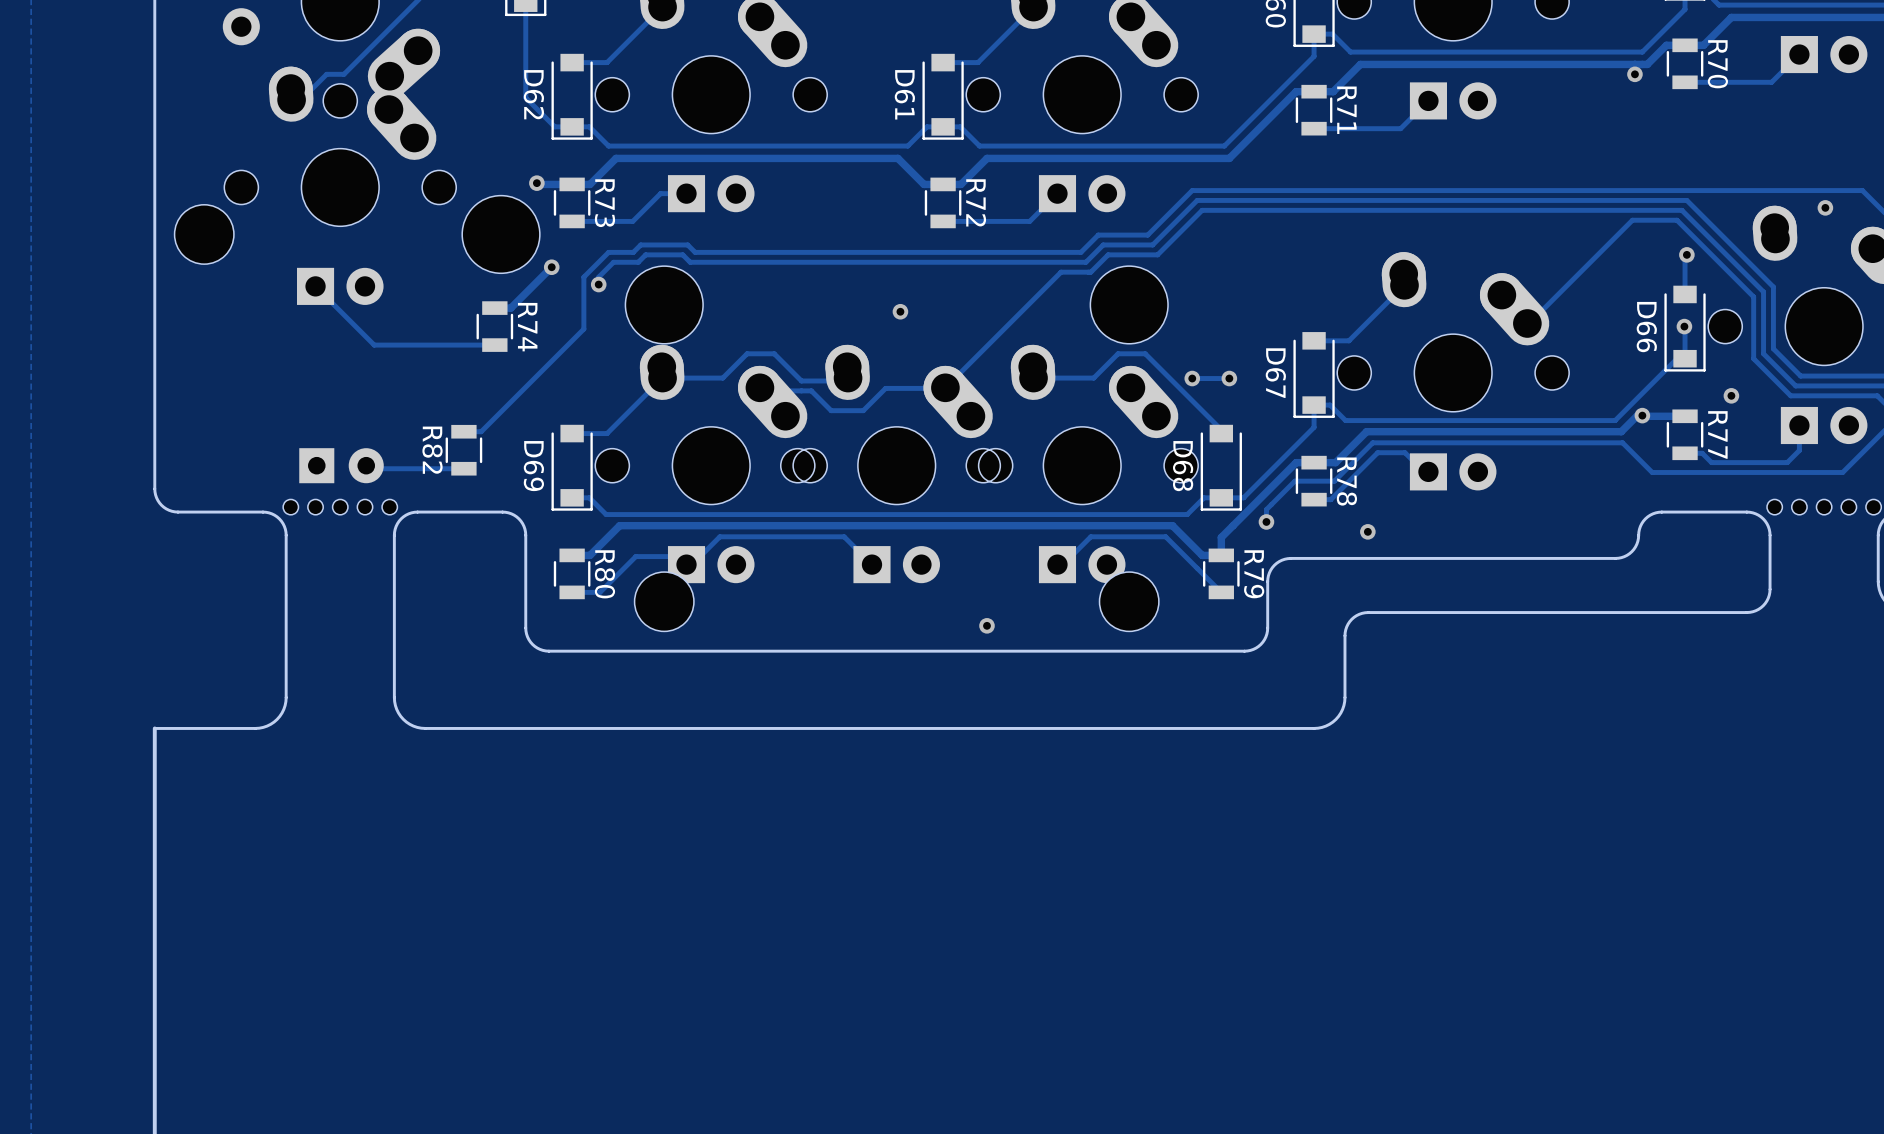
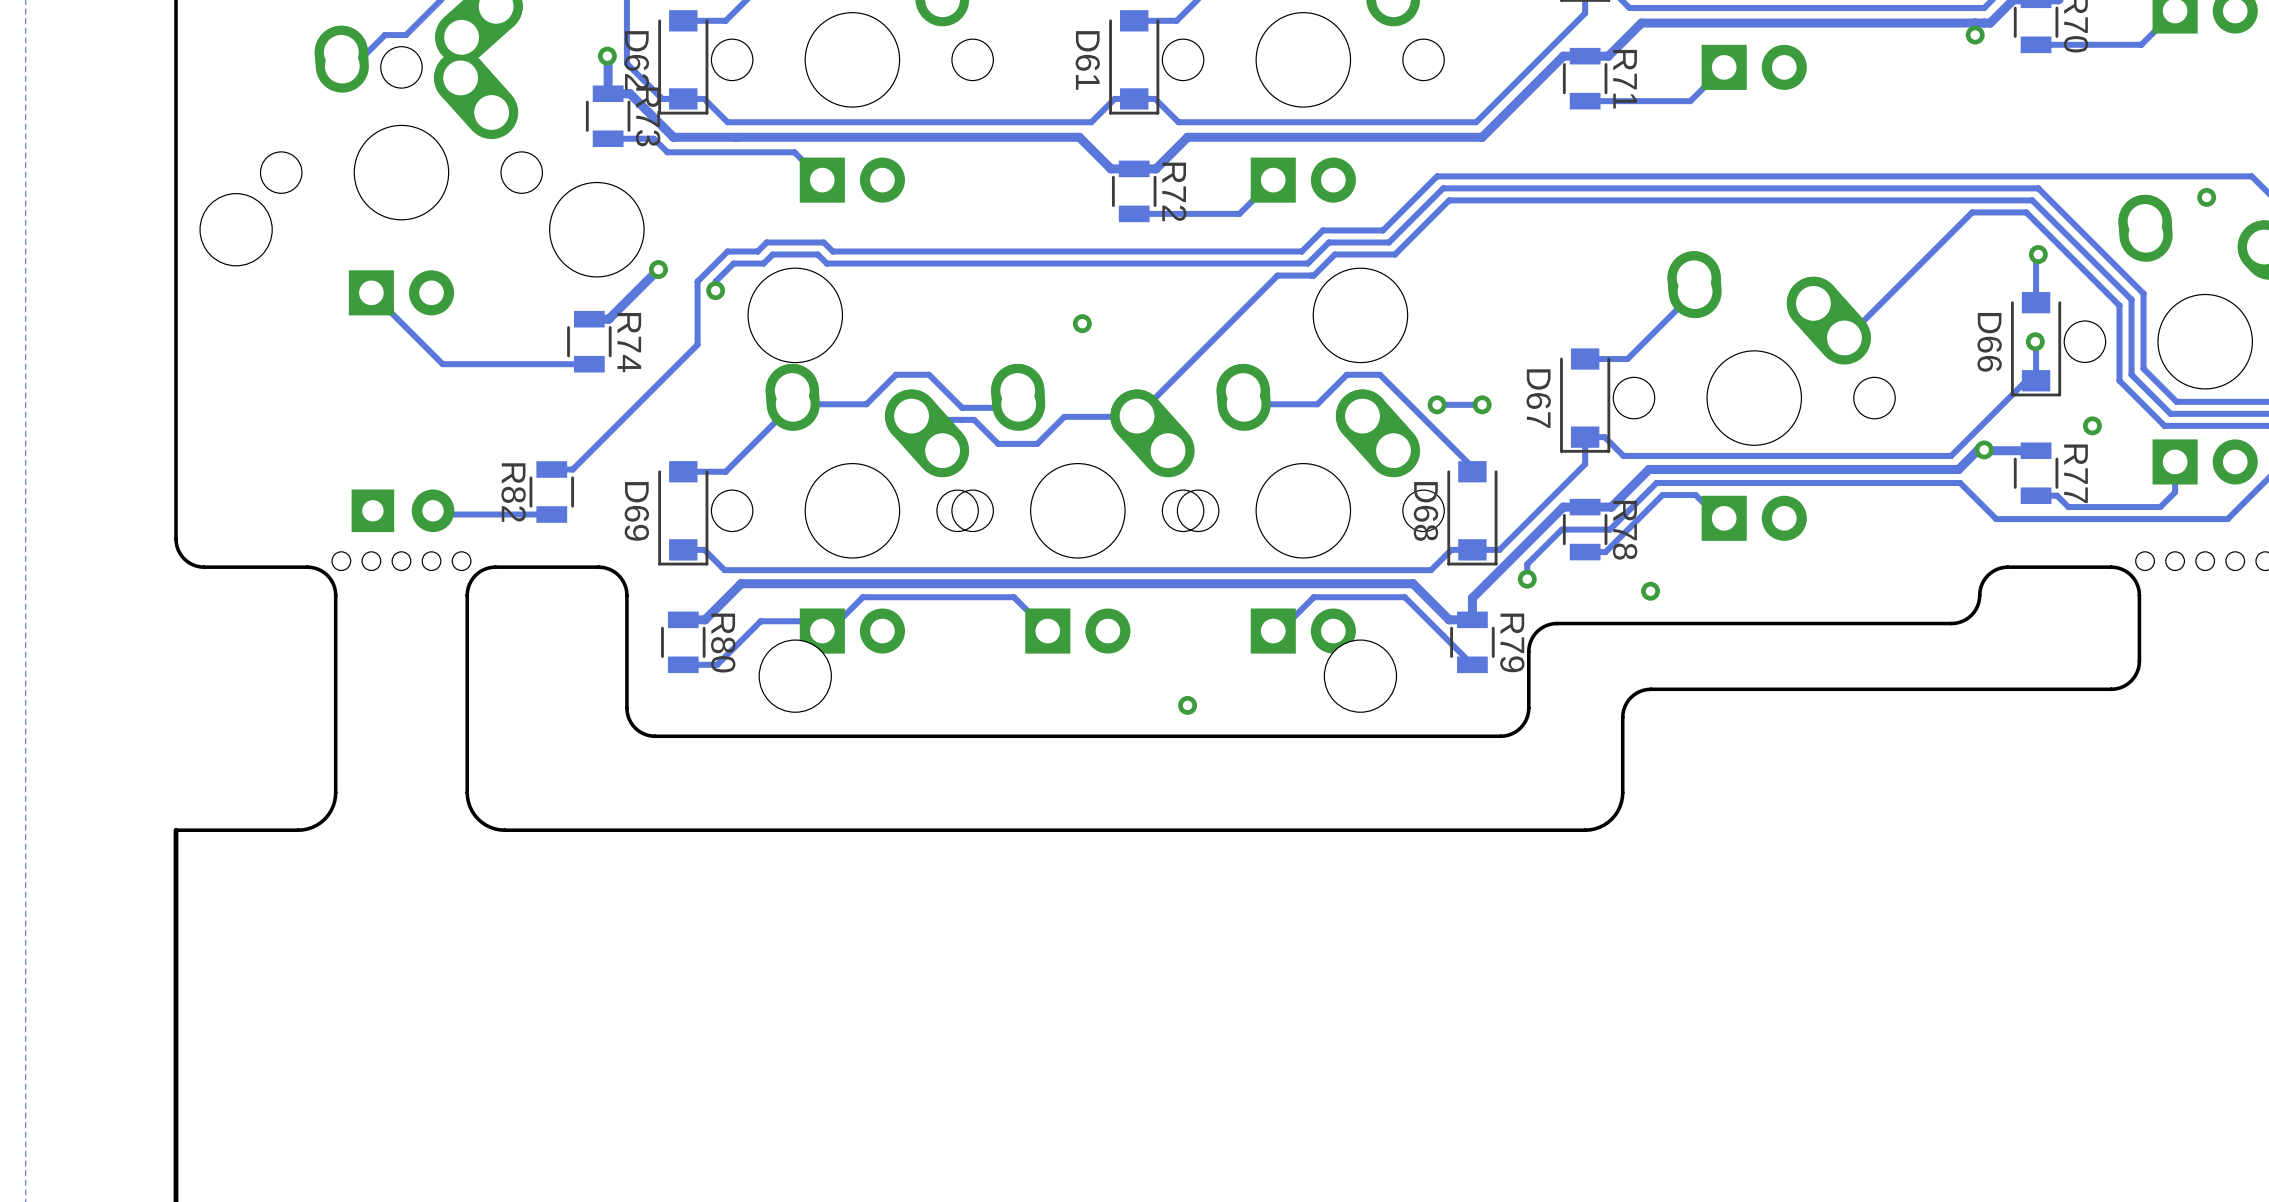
track: (616, 158) (590, 184) (536, 183) -> (736, 137) (673, 137) (629, 93) (608, 93) (607, 56)
via position: (536, 183) -> (607, 56)
track: (686, 193) (660, 193) (632, 221) (572, 221) -> (822, 180) (794, 152) (667, 152) (653, 138) (608, 138)
R73 position: (572, 202) -> (608, 116)

